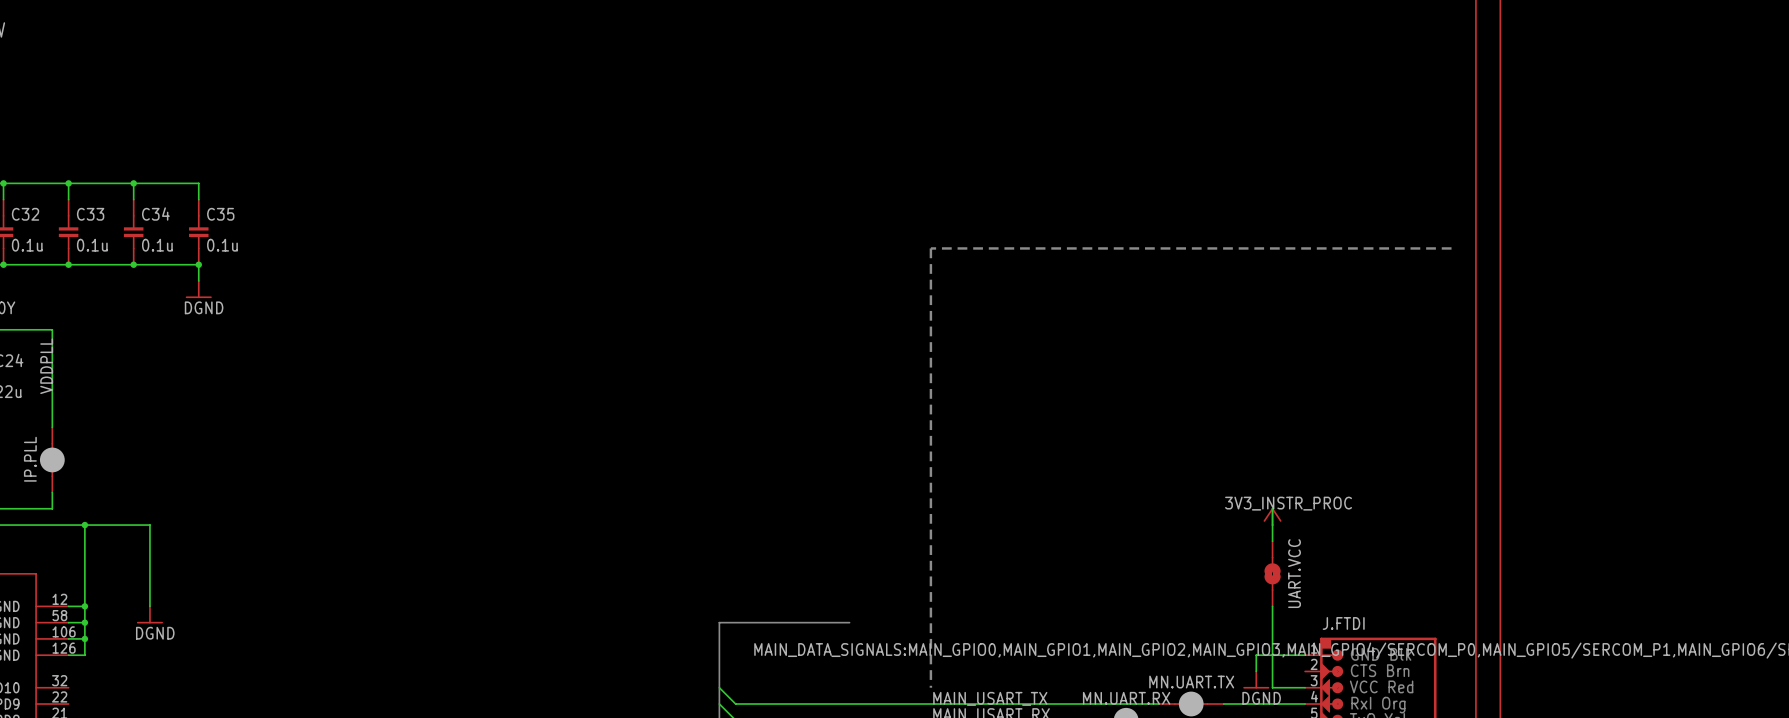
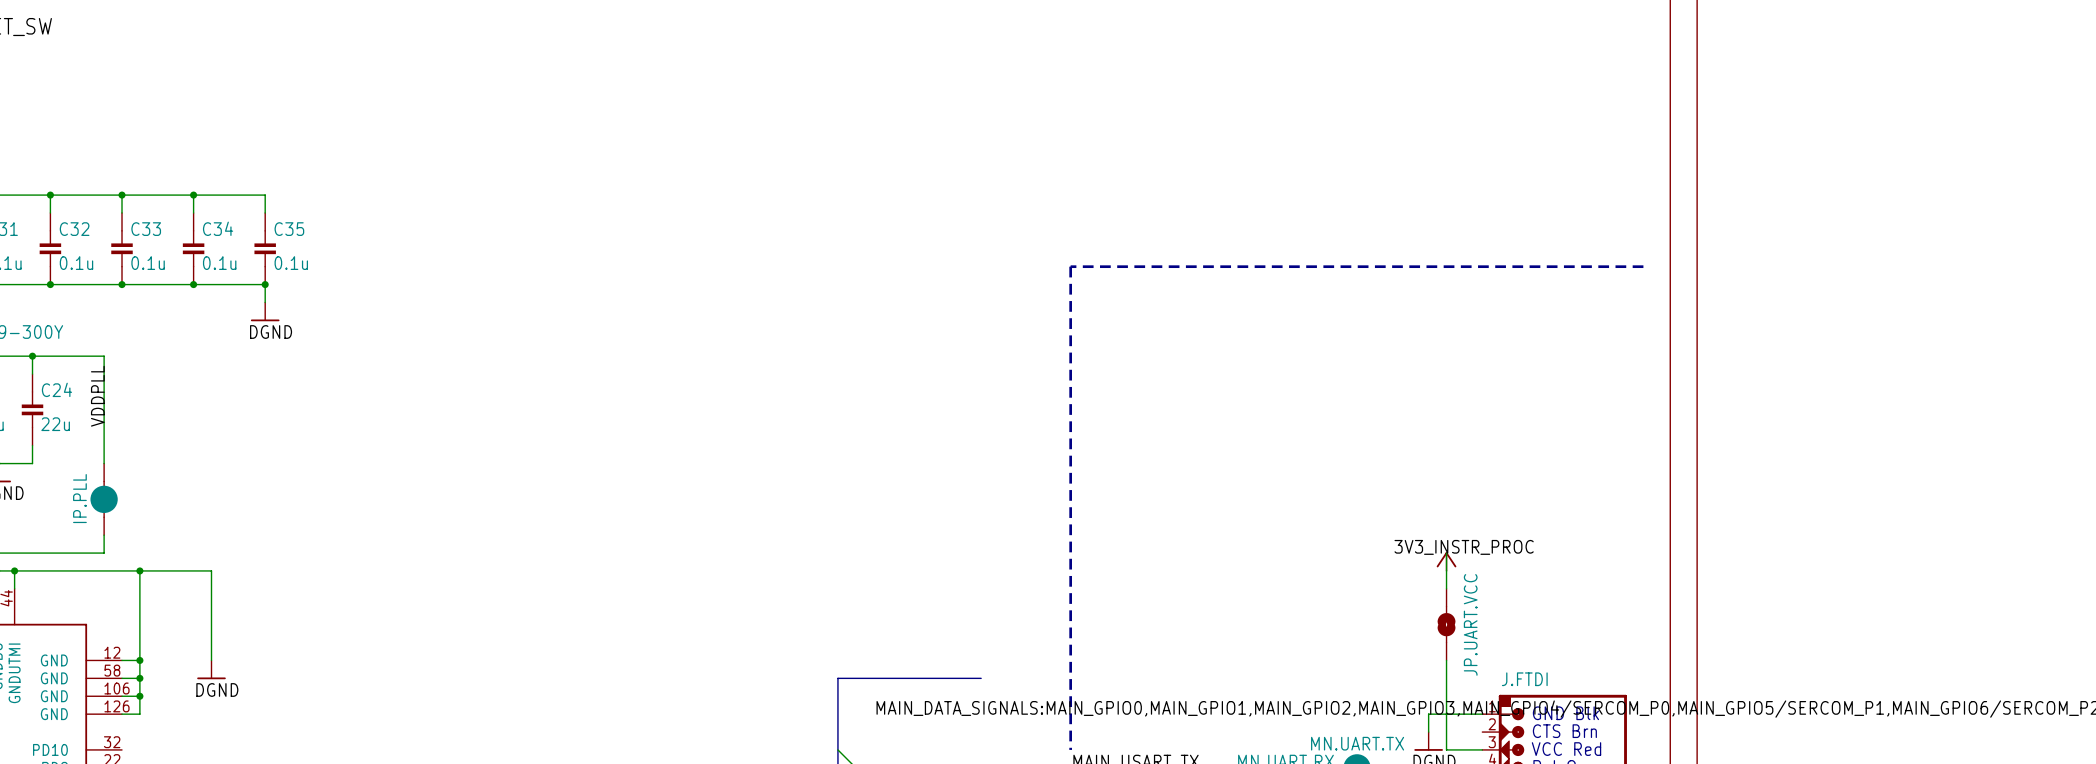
UART.VCC name: UART.VCC (1294, 573) -> JP.UART.VCC (1470, 624)

